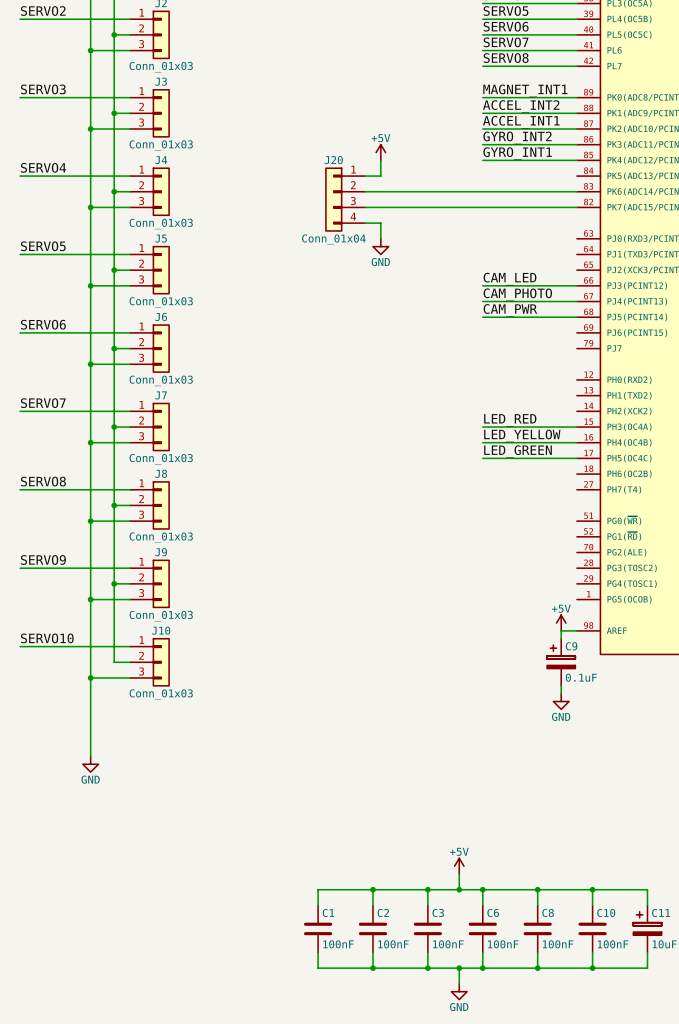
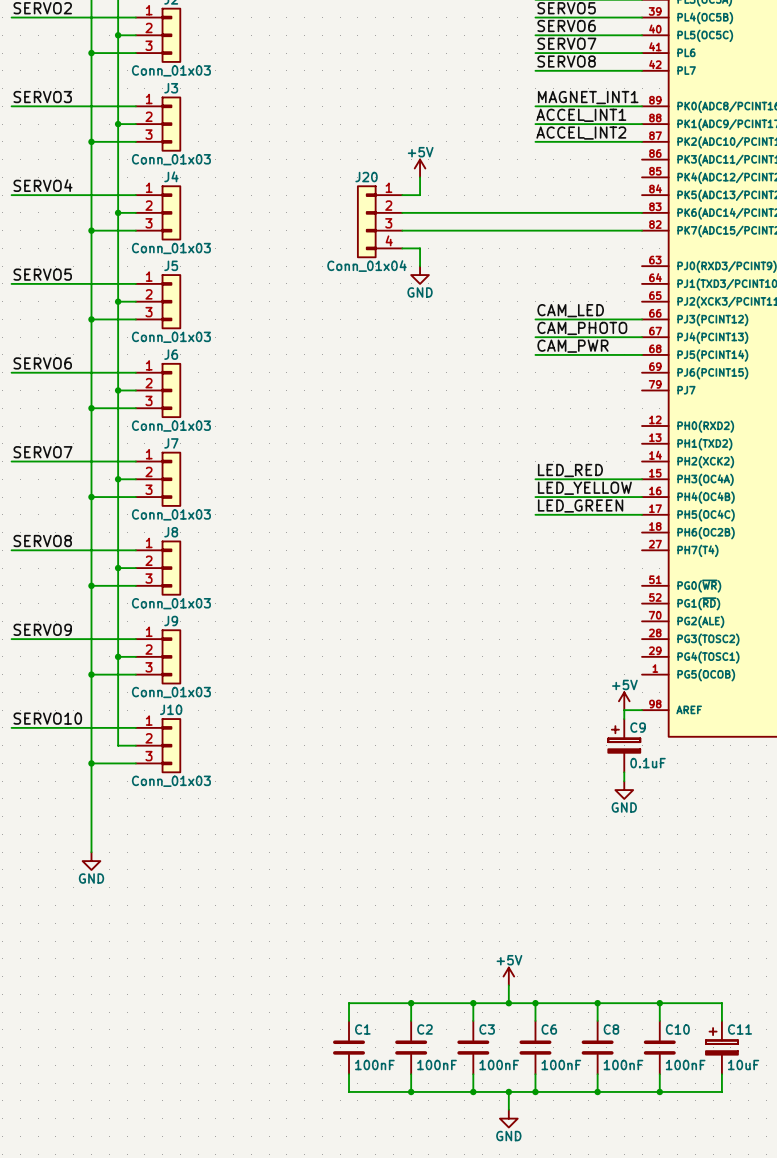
label: ACCEL_INT2 (521, 106) -> ACCEL_INT1 (581, 115)
label: ACCEL_INT1 (521, 122) -> ACCEL_INT2 (581, 133)
label: GYRO_INT2 (517, 137) -> none
wire: (482, 144) (576, 144) -> none
label: GYRO_INT1 (517, 153) -> none
wire: (482, 160) (576, 160) -> none

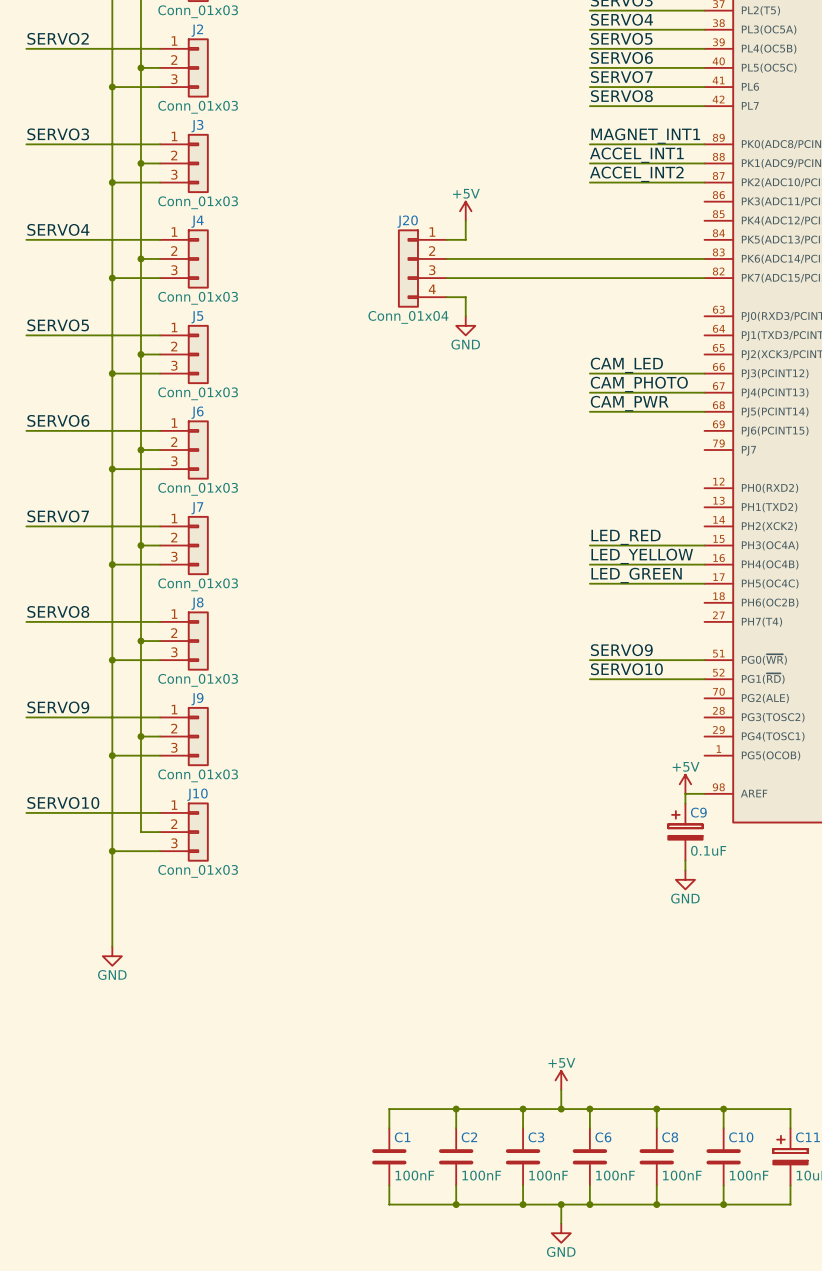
label: none -> SERVO9 (621, 650)
wire: none -> (589, 660) (704, 660)
label: none -> SERVO10 (626, 669)
wire: none -> (589, 679) (704, 679)

